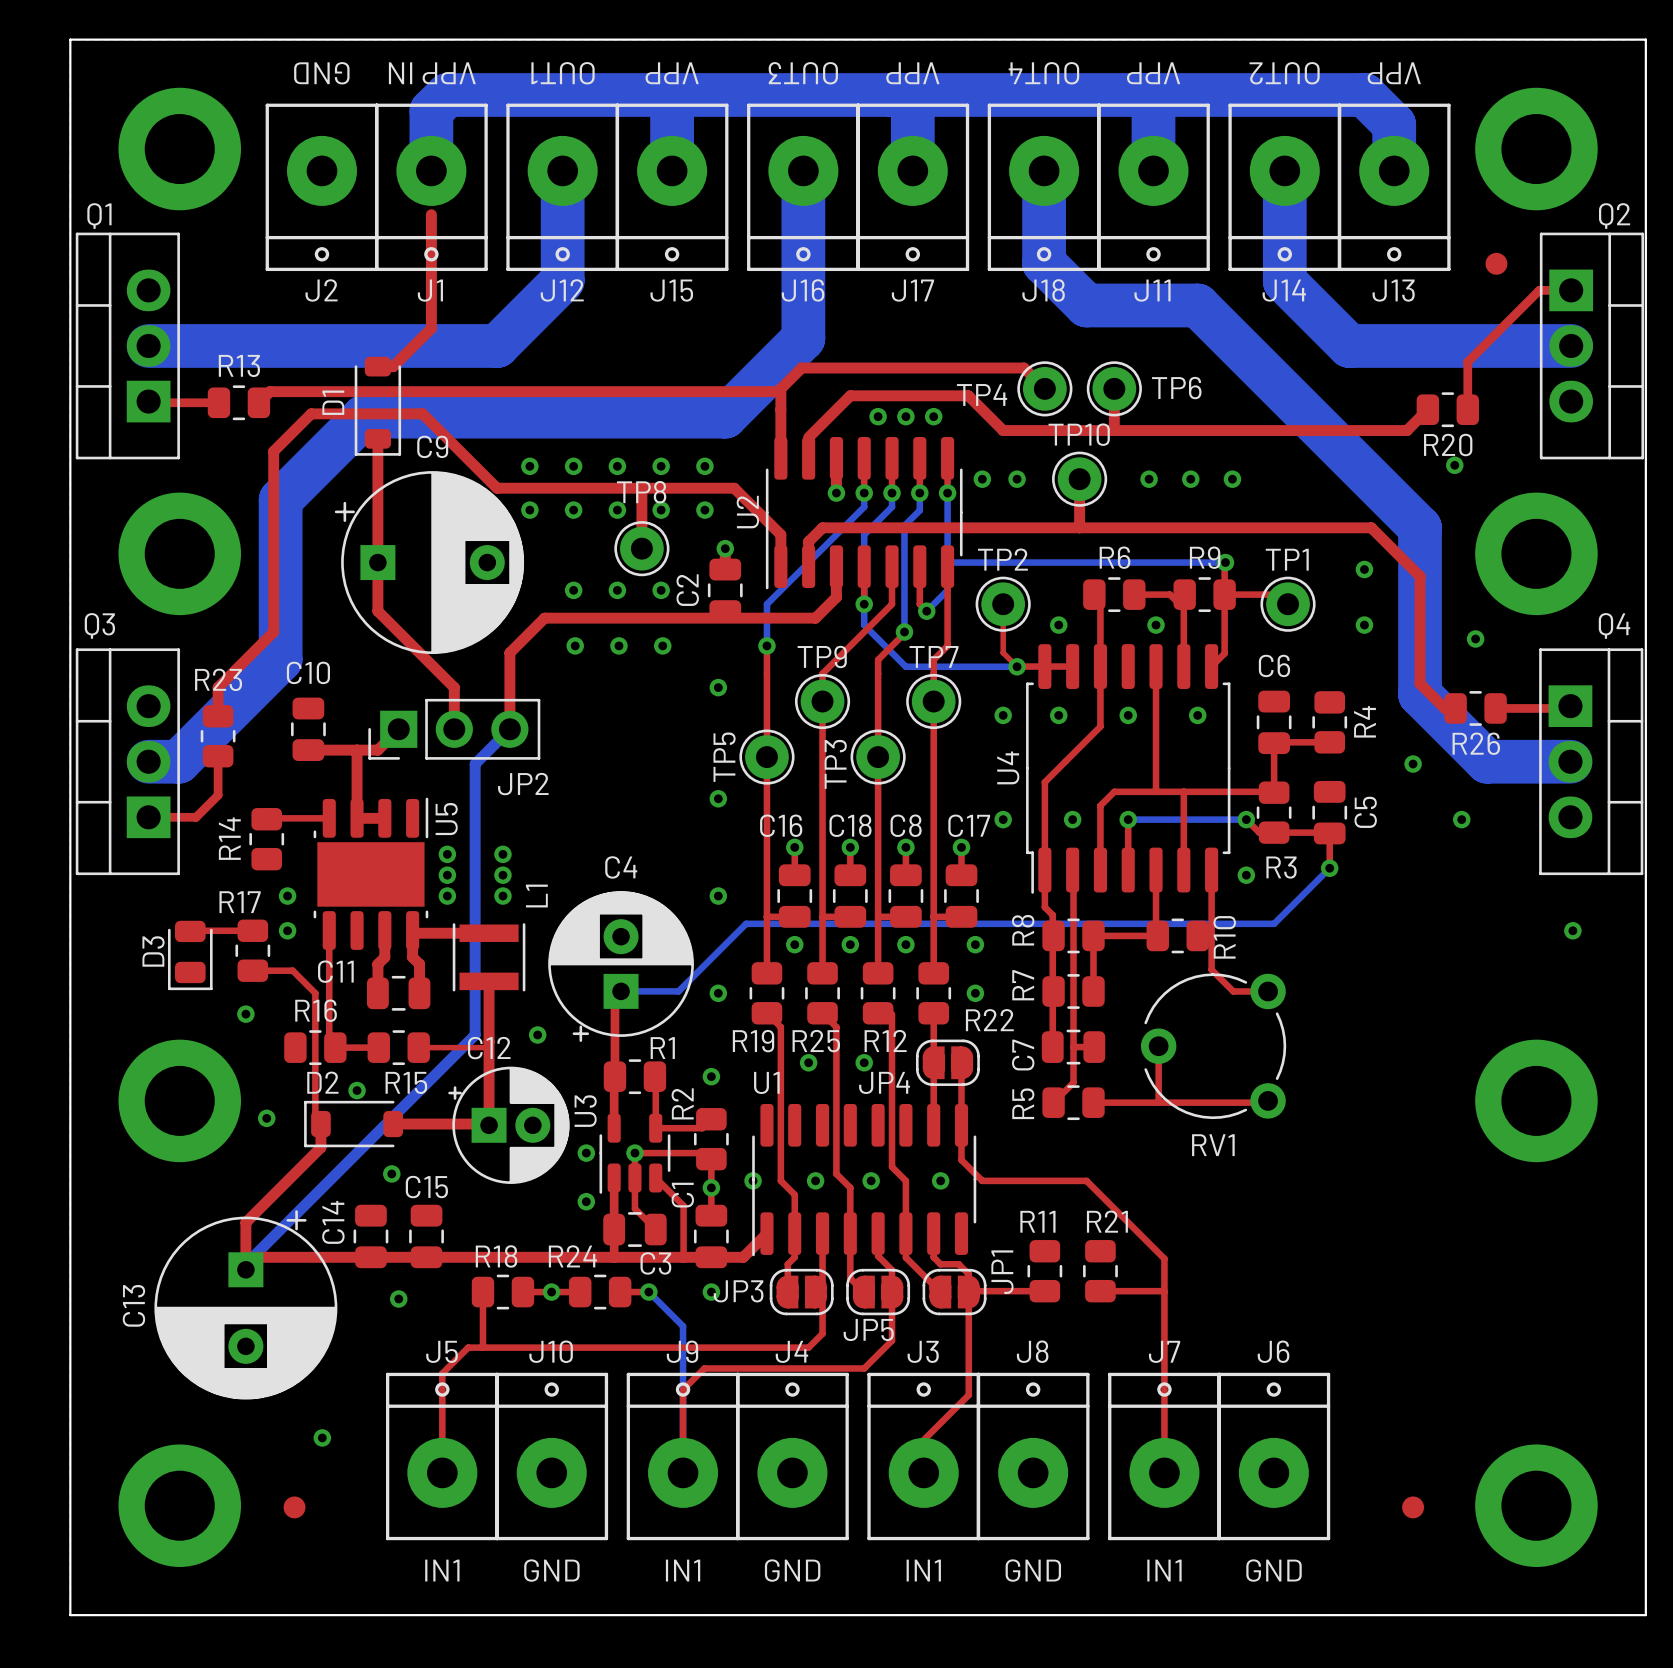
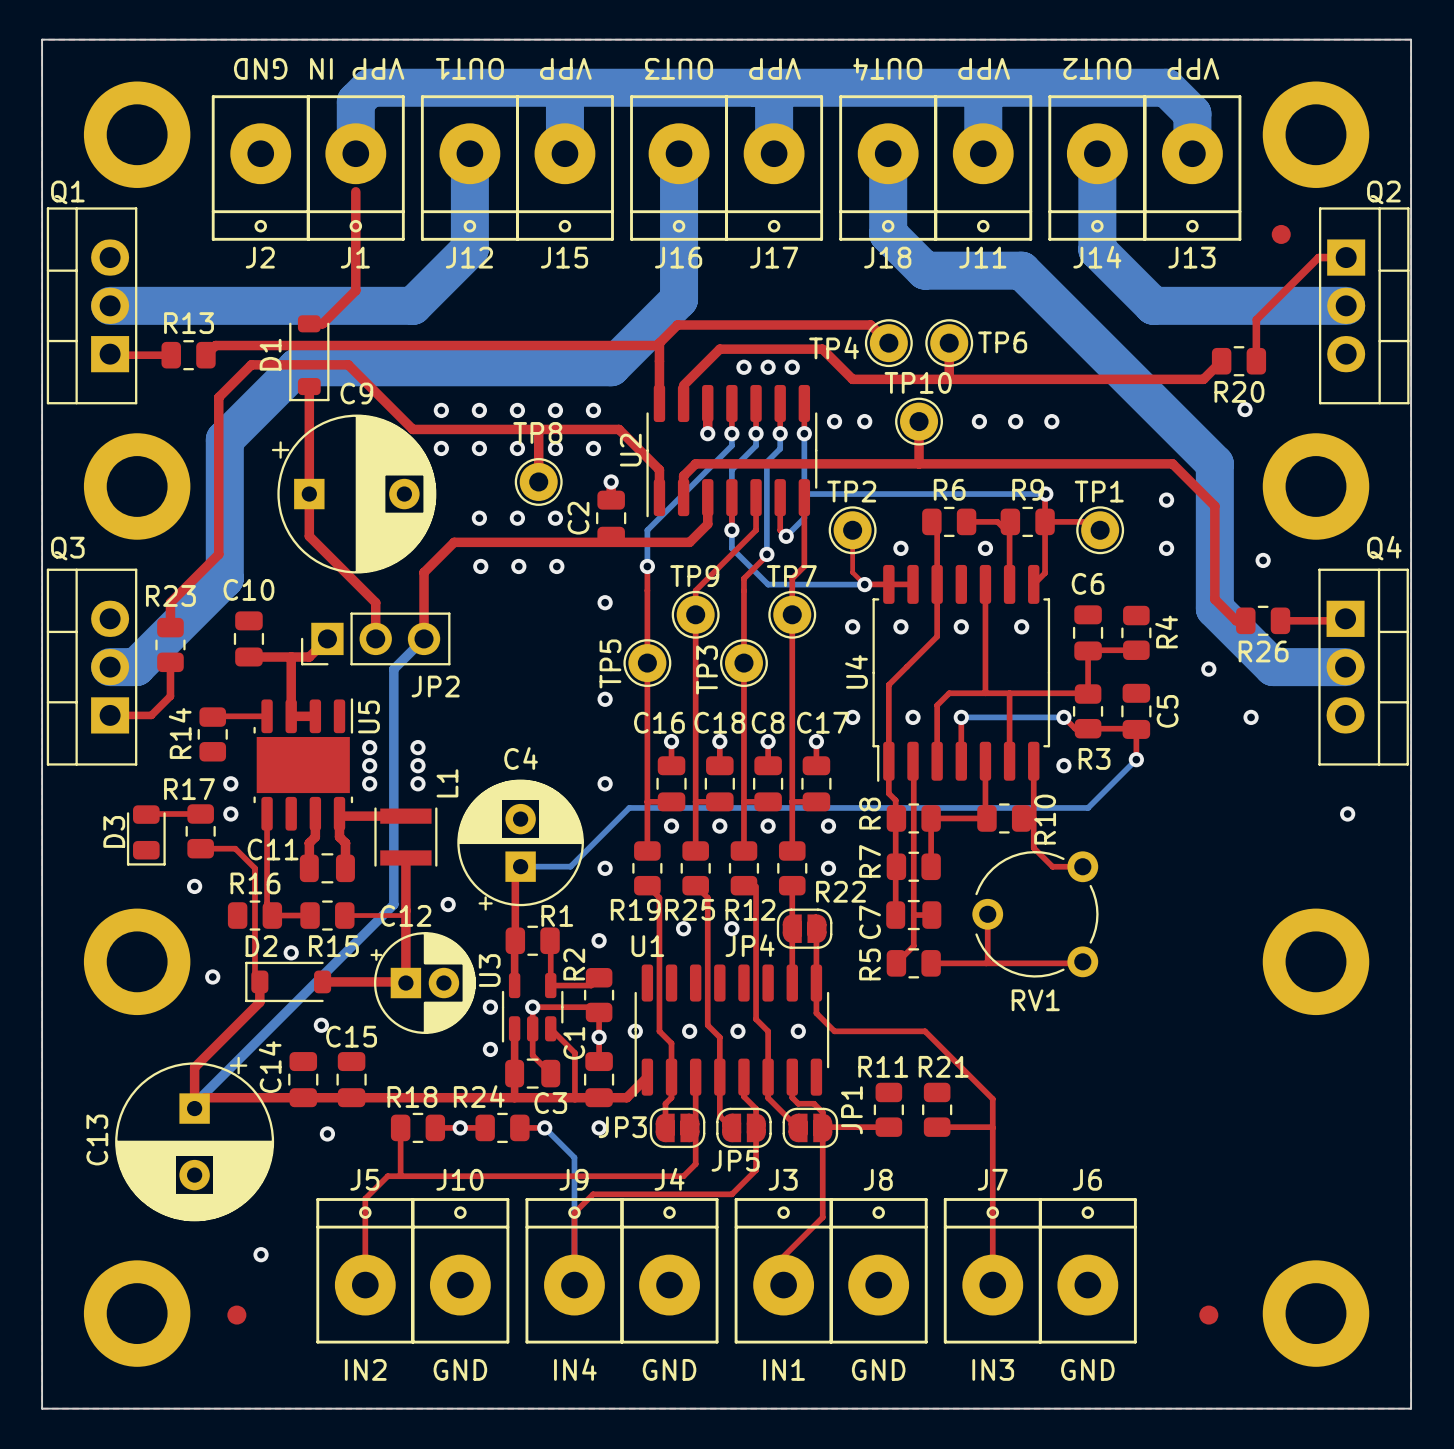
J5 text: IN1 (442, 1570) -> IN2 (365, 1369)
J9 text: IN1 (683, 1570) -> IN4 (575, 1369)
J7 text: IN1 (1164, 1570) -> IN3 (993, 1369)

